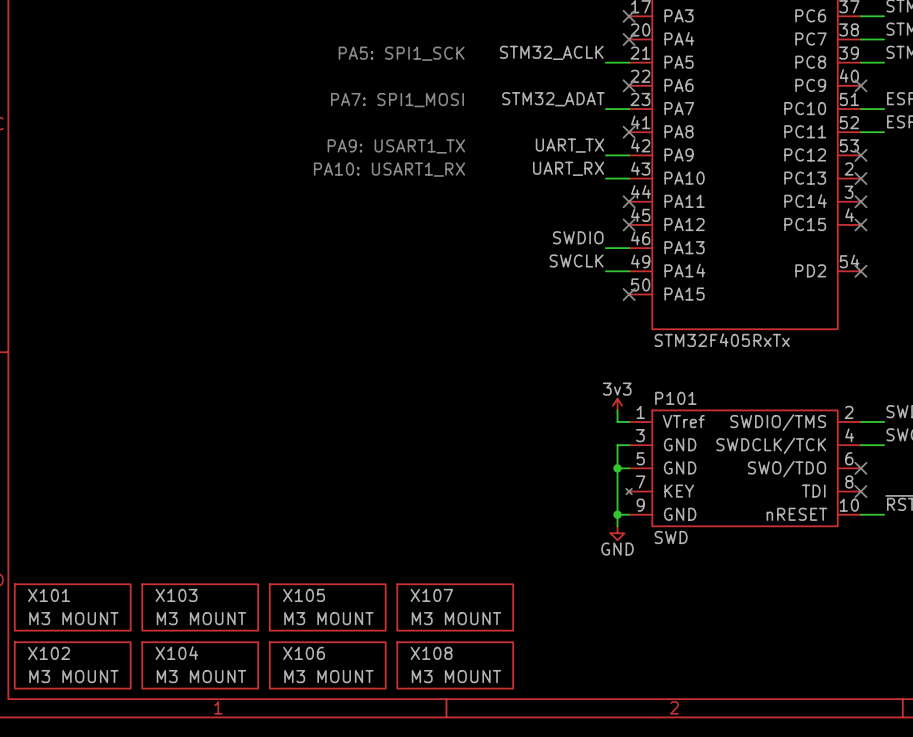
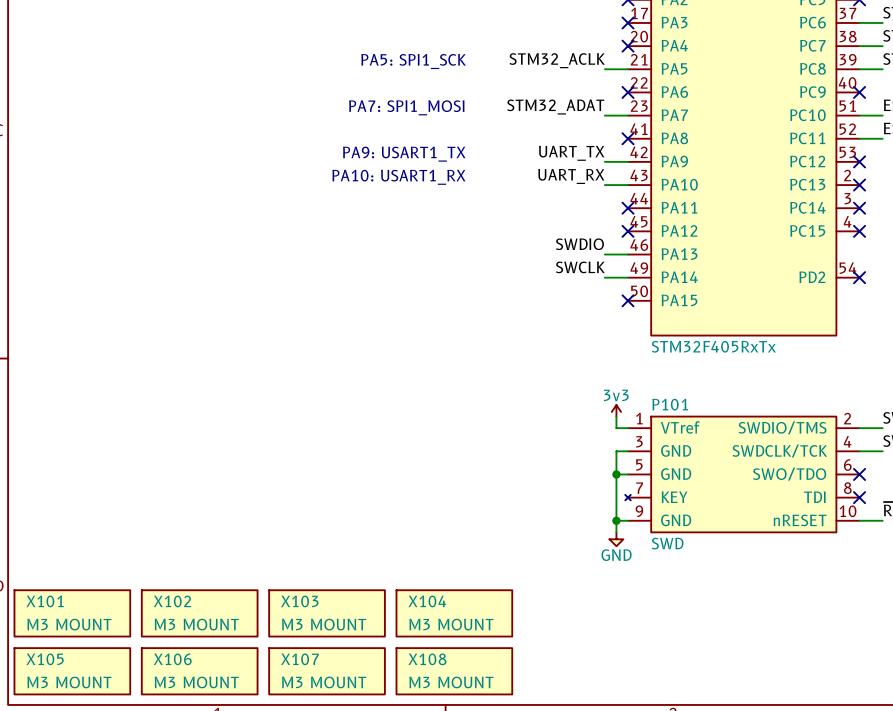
X103 name: X103 (176, 595) -> X102 (172, 601)
X105 name: X105 (304, 595) -> X103 (299, 601)
X107 name: X107 (431, 595) -> X104 (427, 601)
X102 name: X102 (49, 653) -> X105 (45, 659)
X104 name: X104 (176, 653) -> X106 (172, 659)
X106 name: X106 (304, 653) -> X107 (299, 659)

